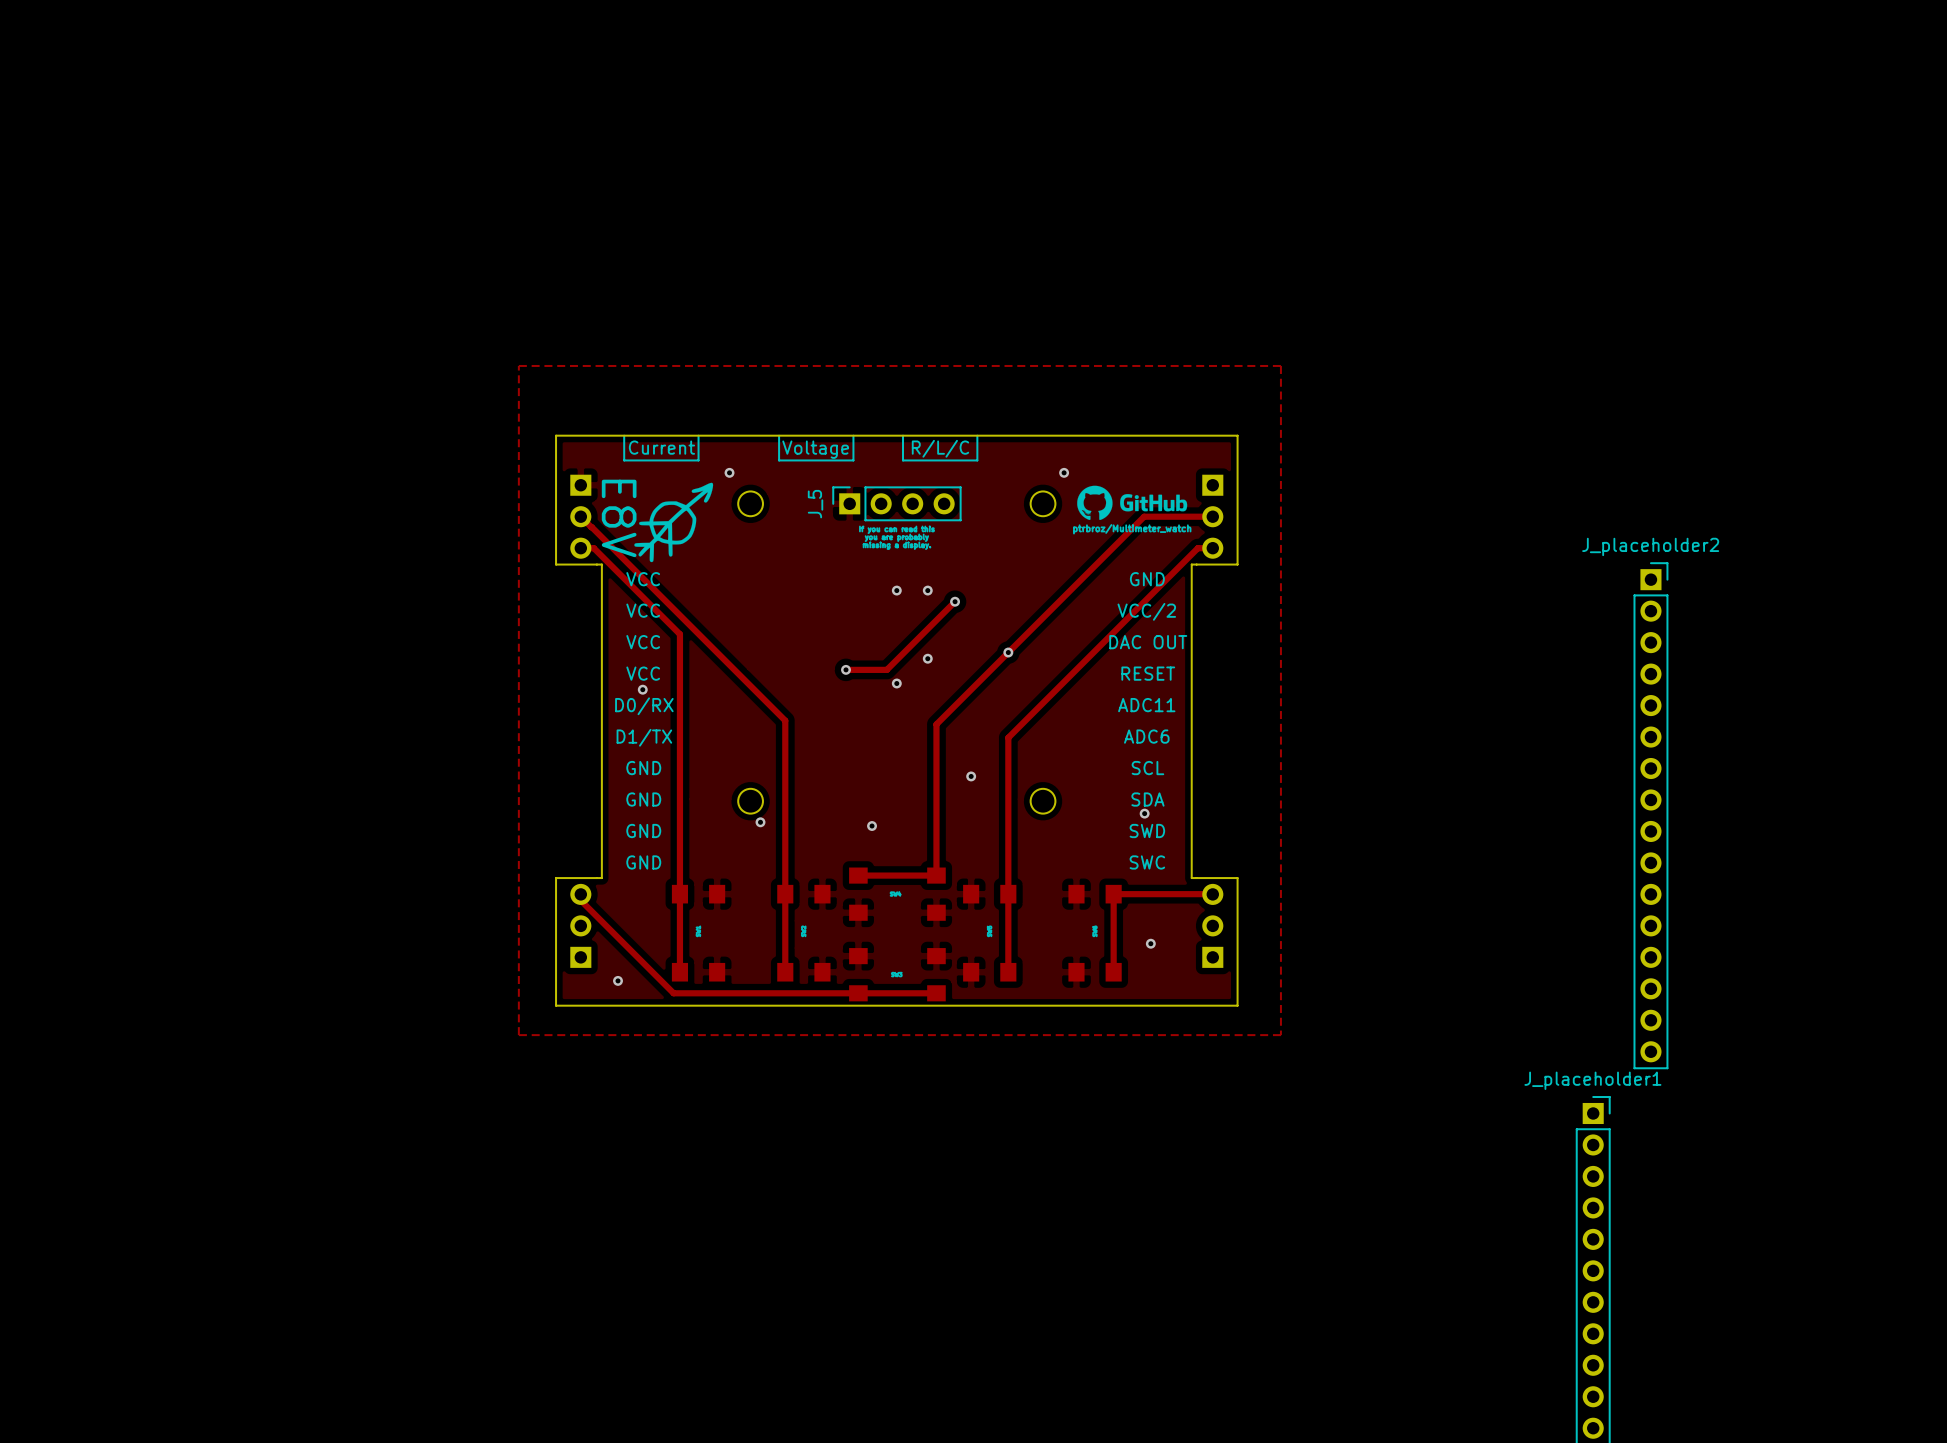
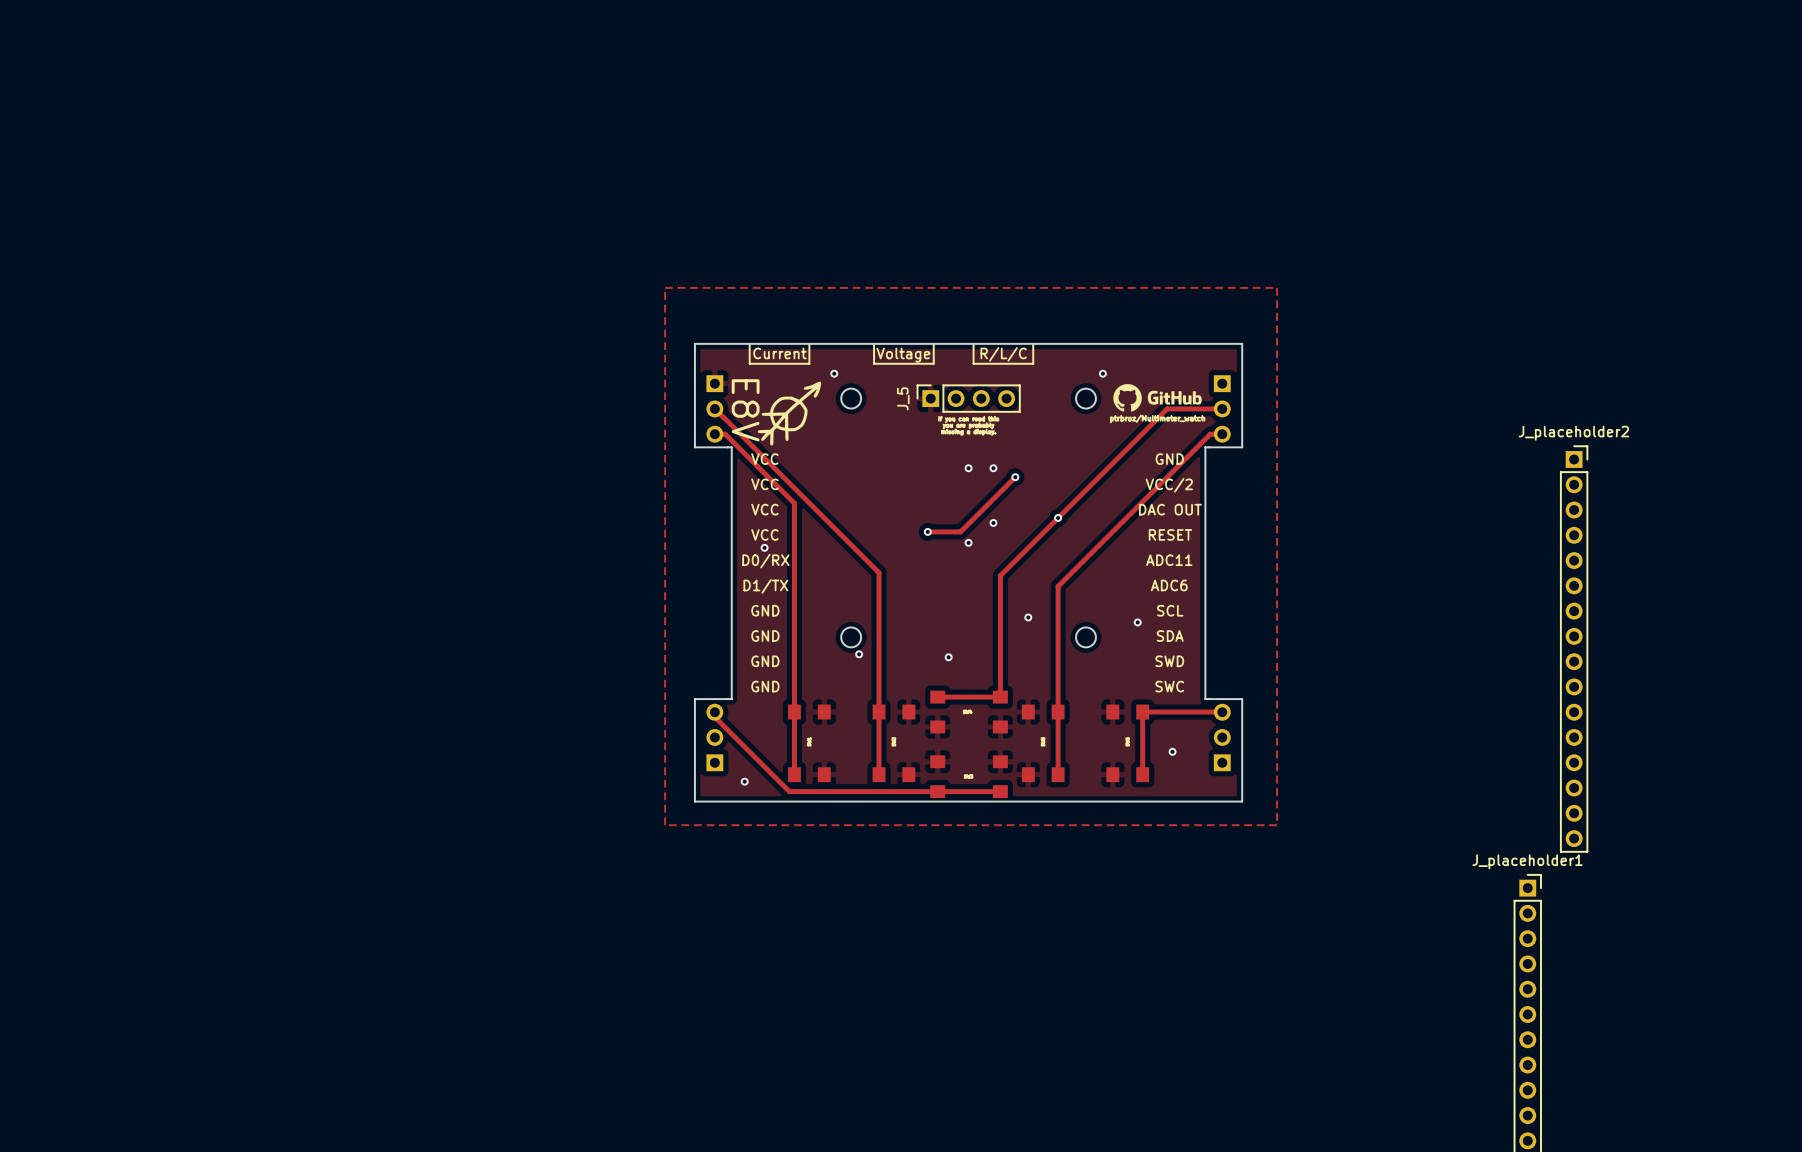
via position: (1144, 813) -> (1137, 622)

